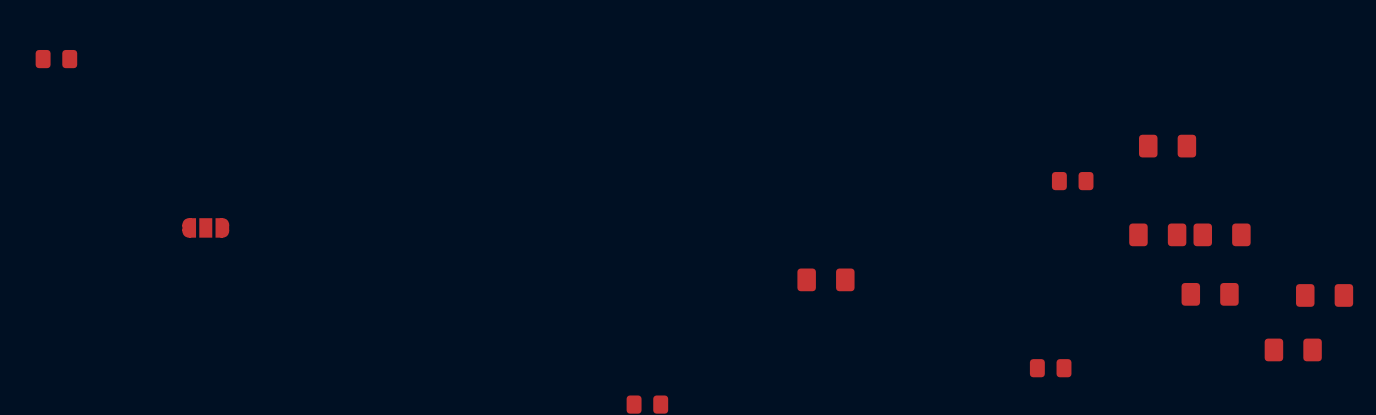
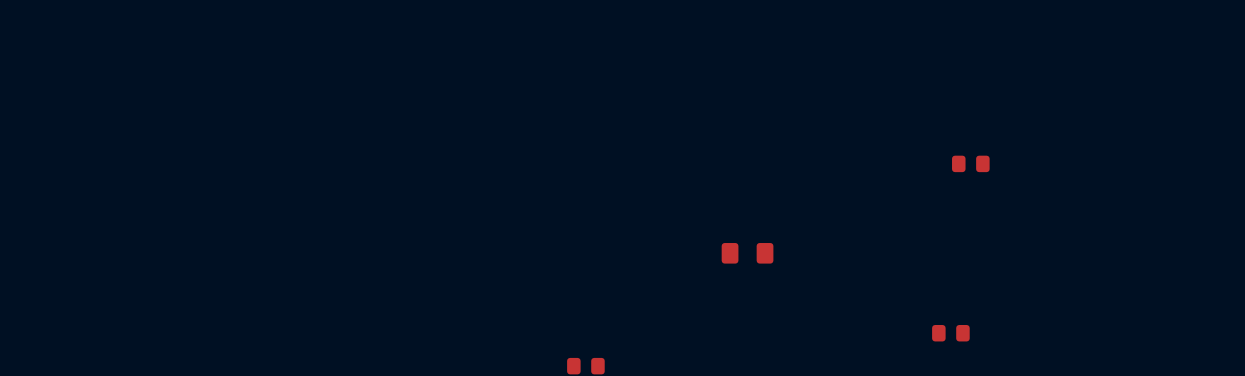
part: (56, 59) -> none
part: (1167, 146) -> none
part: (205, 227) -> none
part: (1157, 234) -> none
part: (1222, 234) -> none
part: (1210, 294) -> none
part: (1324, 295) -> none
part: (1293, 349) -> none

